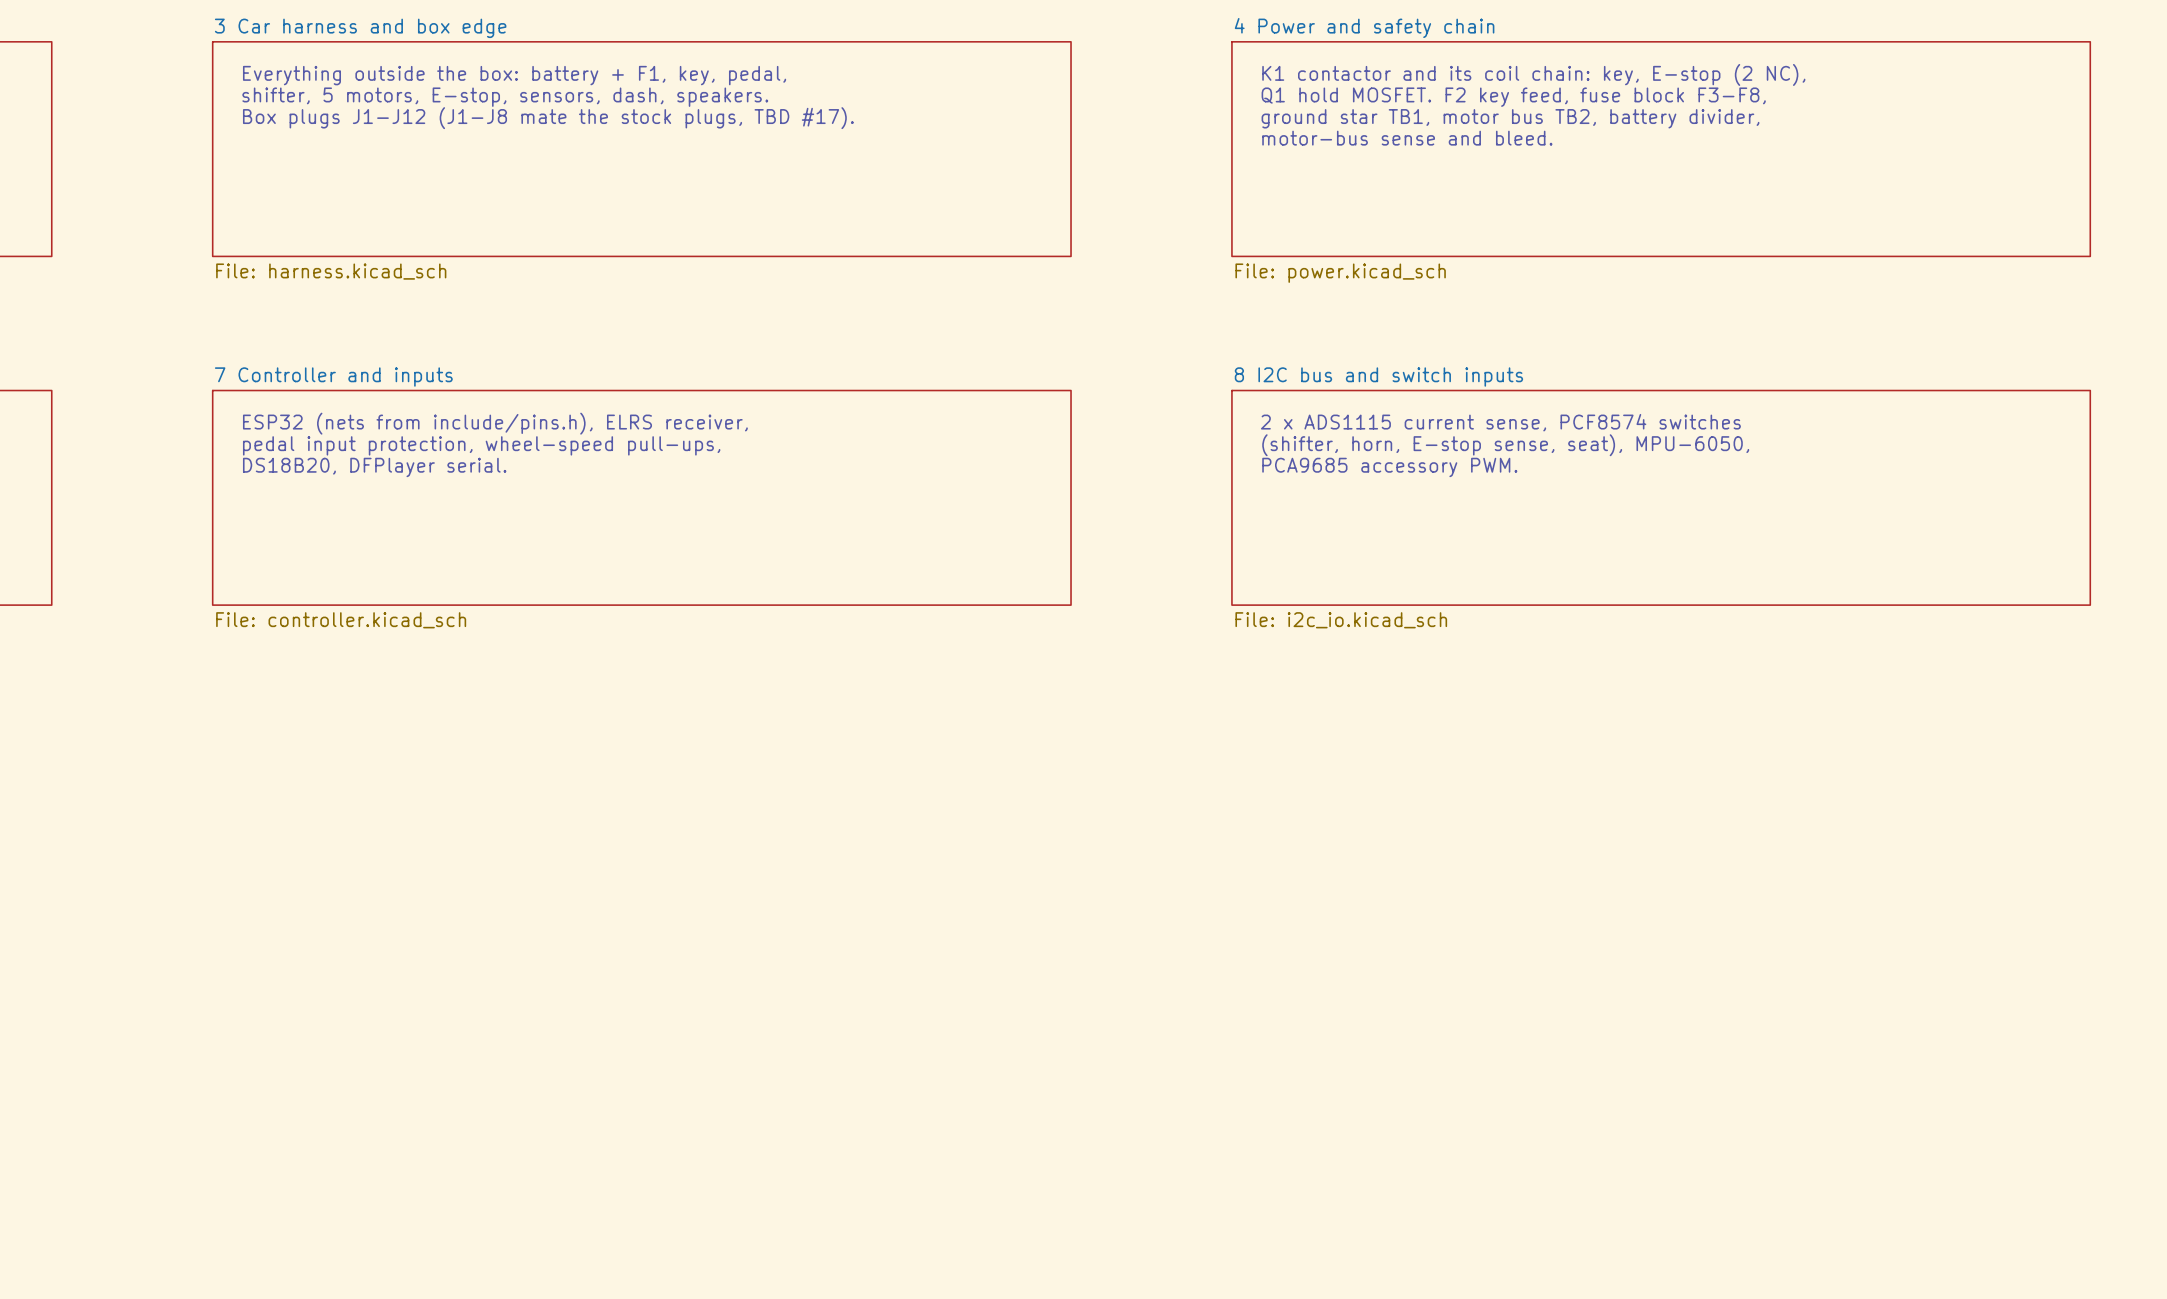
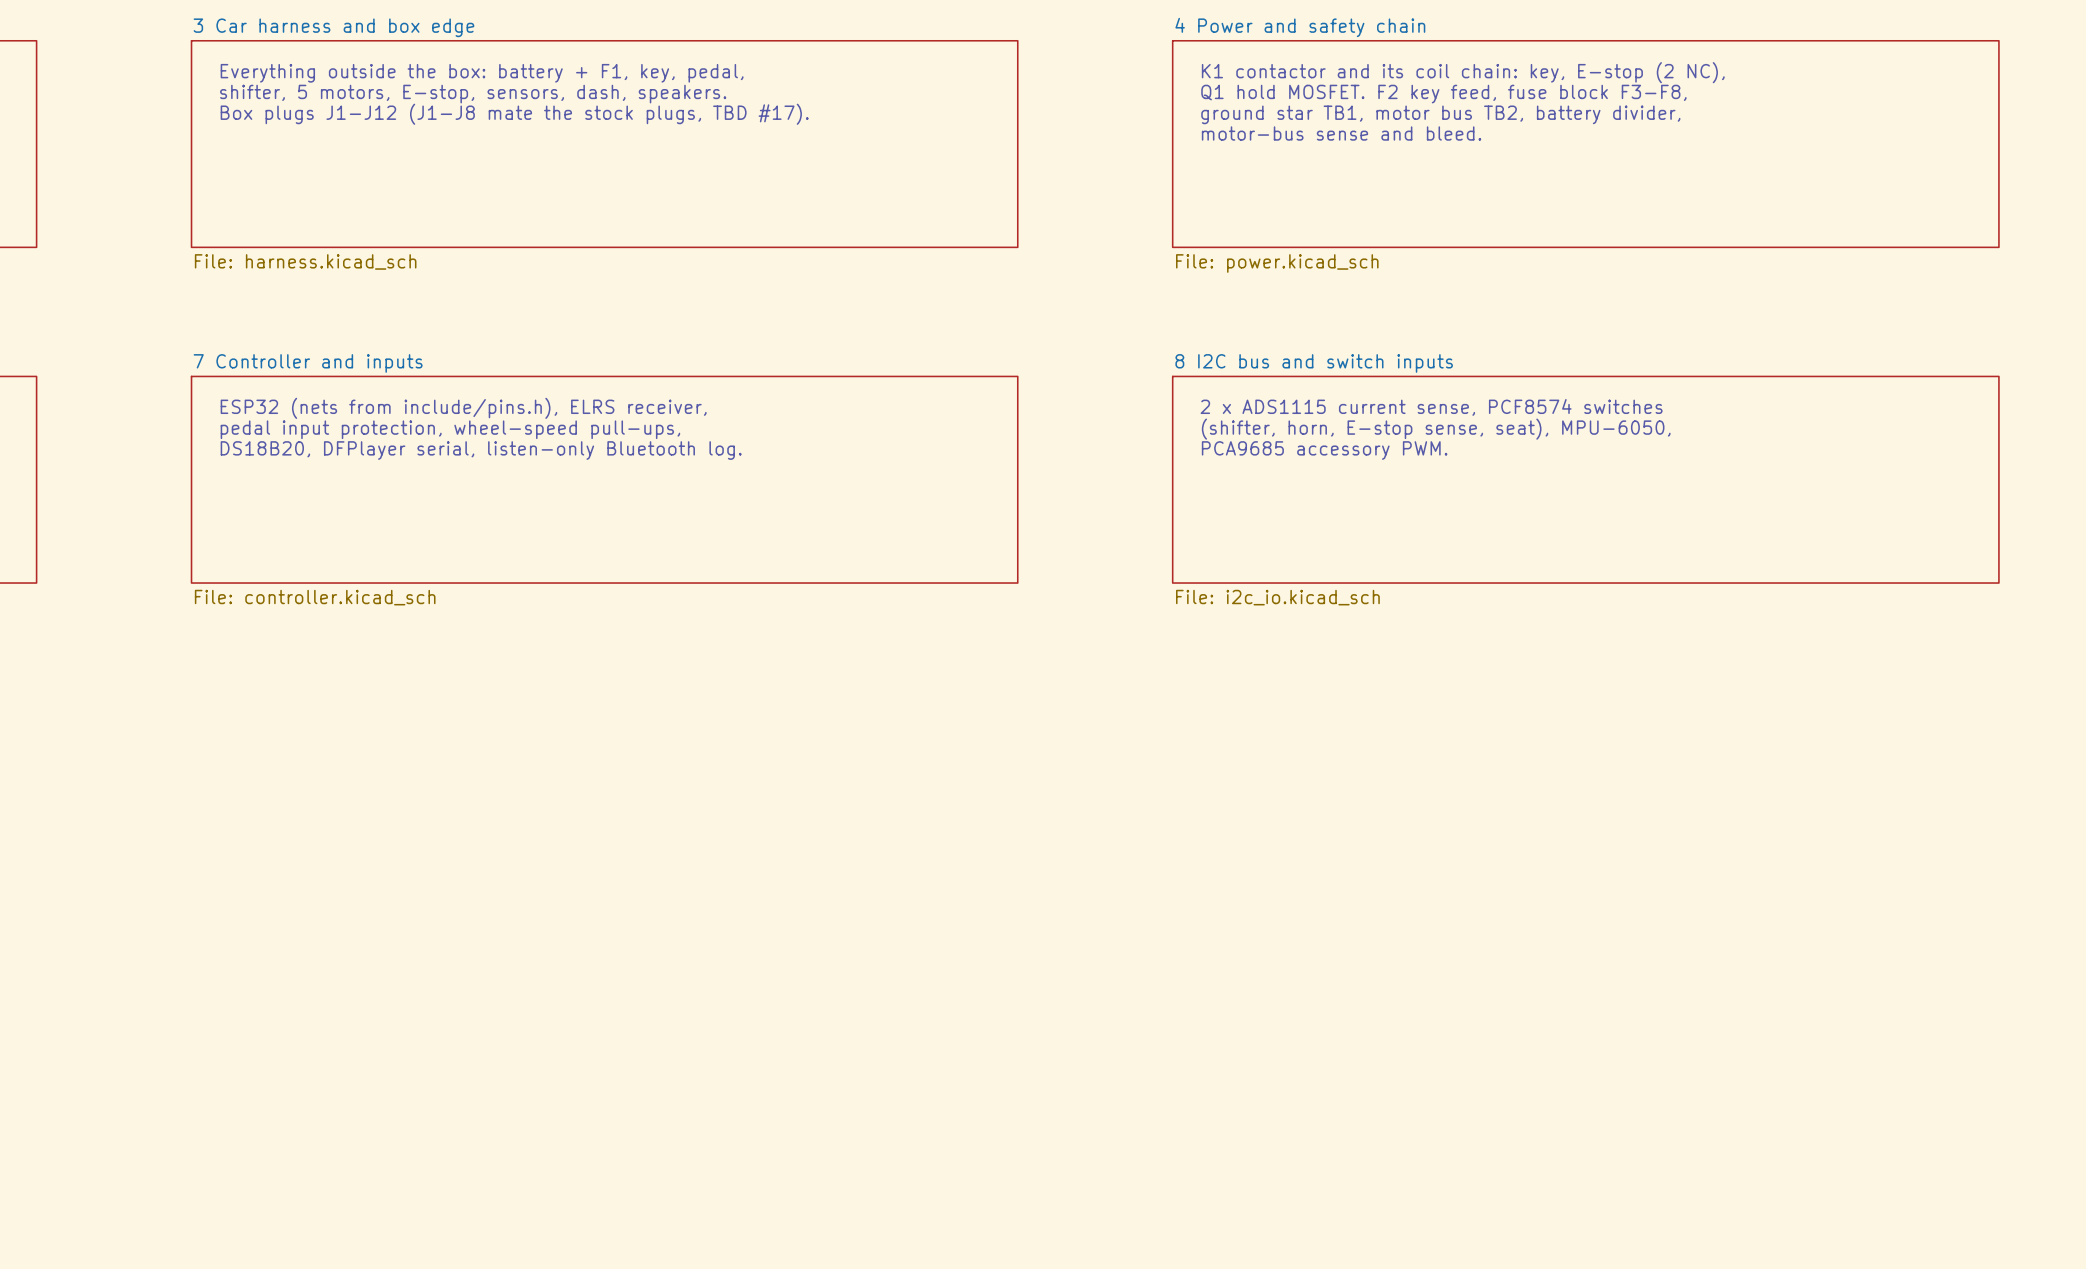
text: DS18B20, DFPlayer serial. (374, 467) -> DS18B20, DFPlayer serial, listen-only Bluetooth log. (481, 450)

